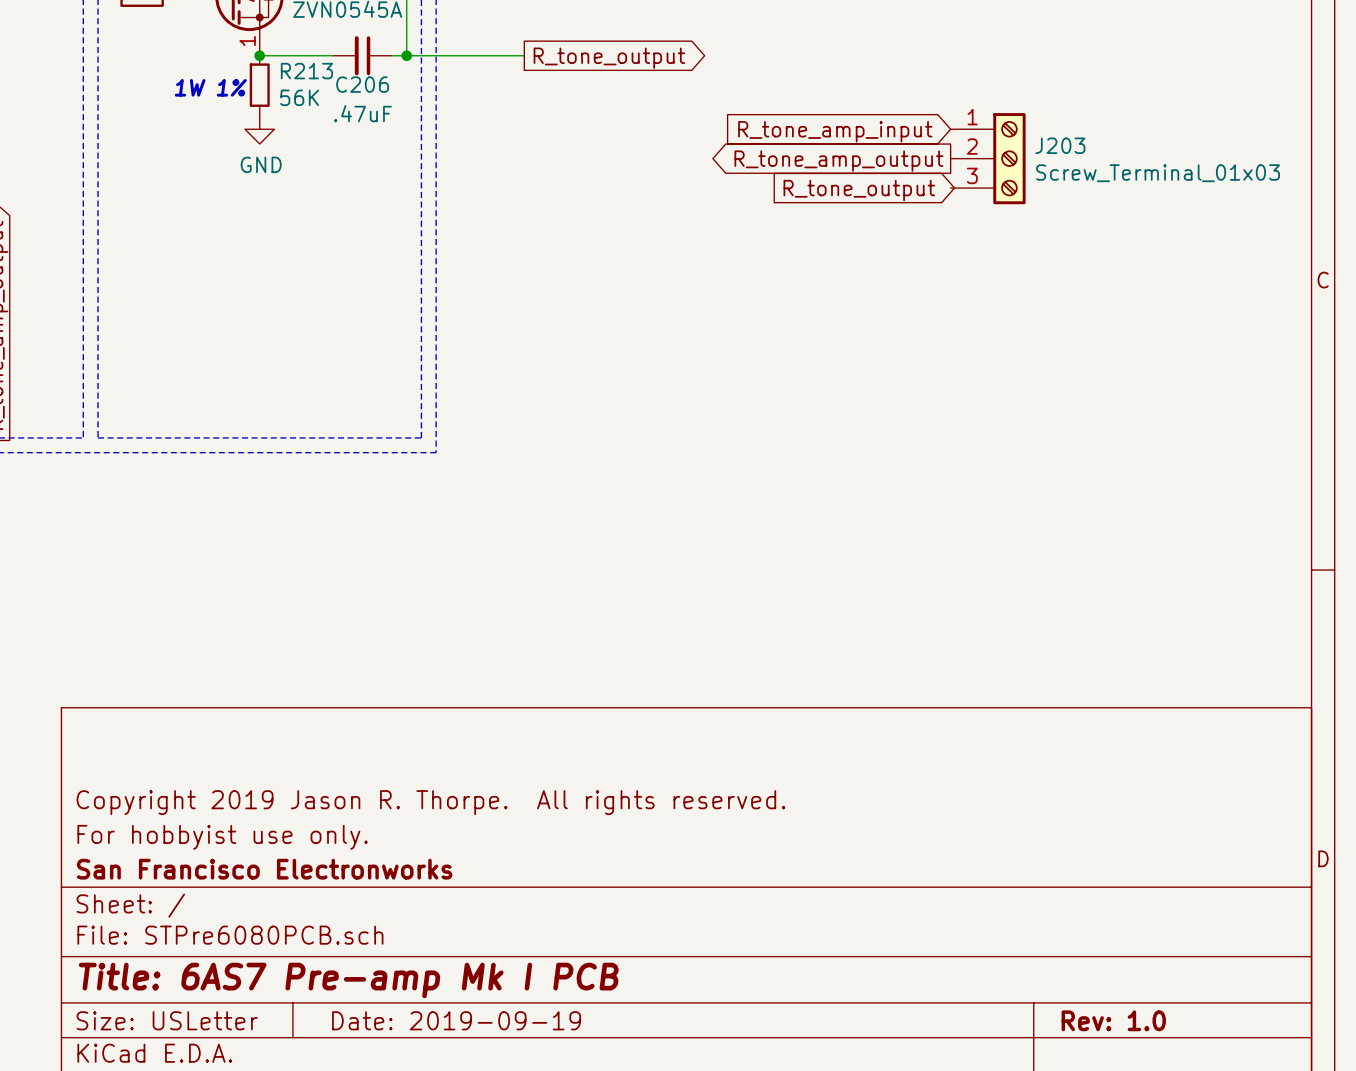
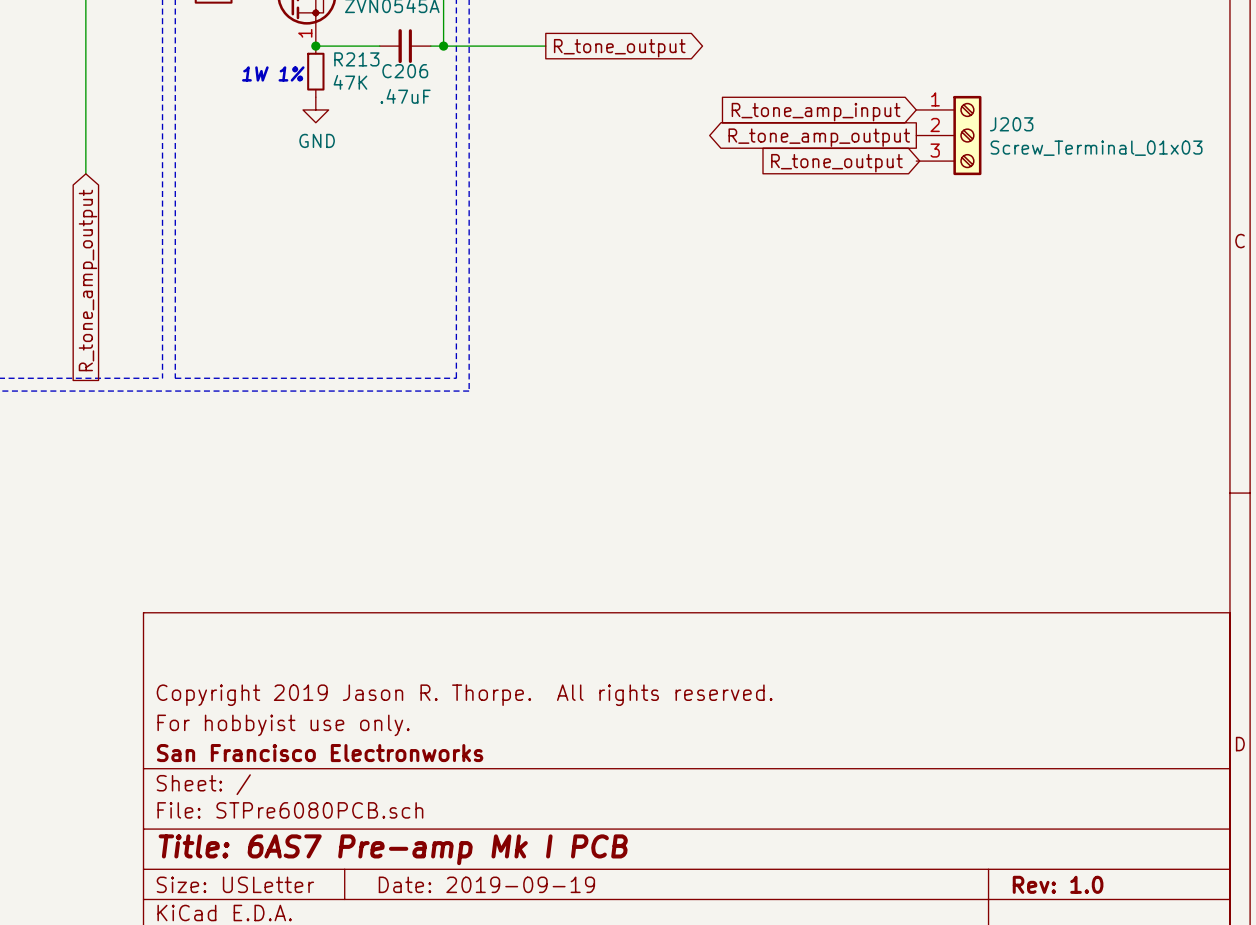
R213 value: 56K (299, 97) -> 47K (350, 82)

